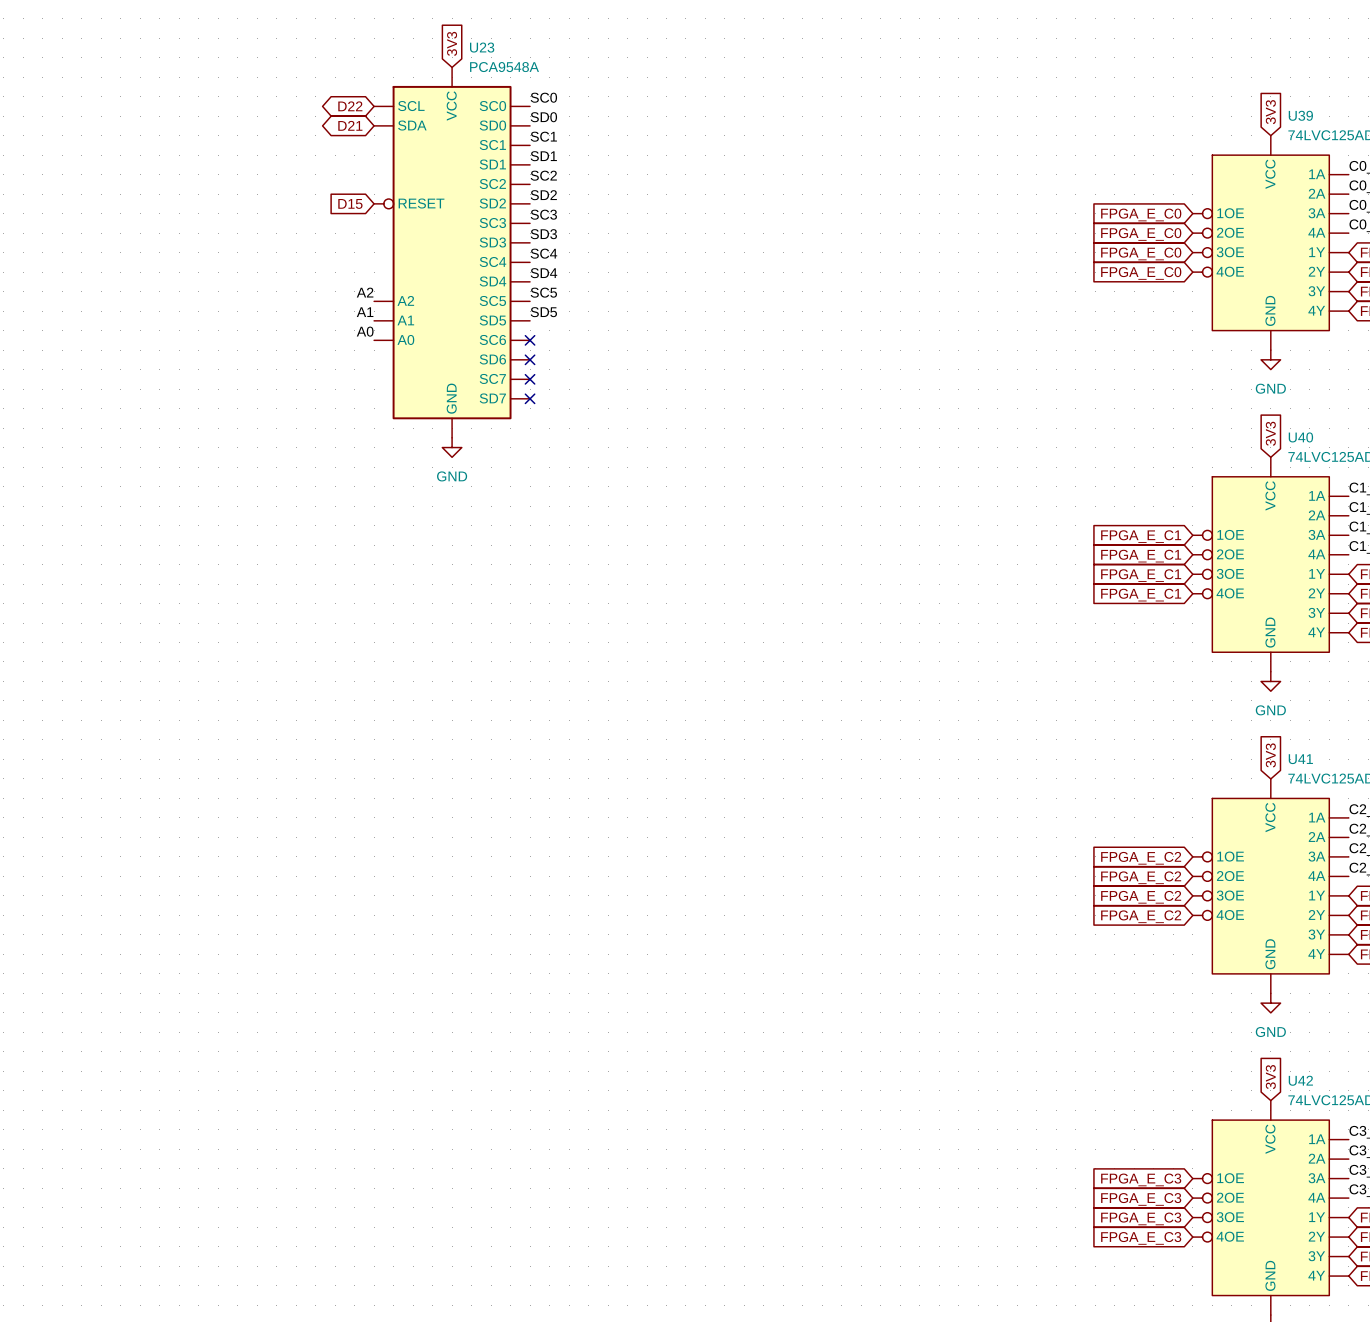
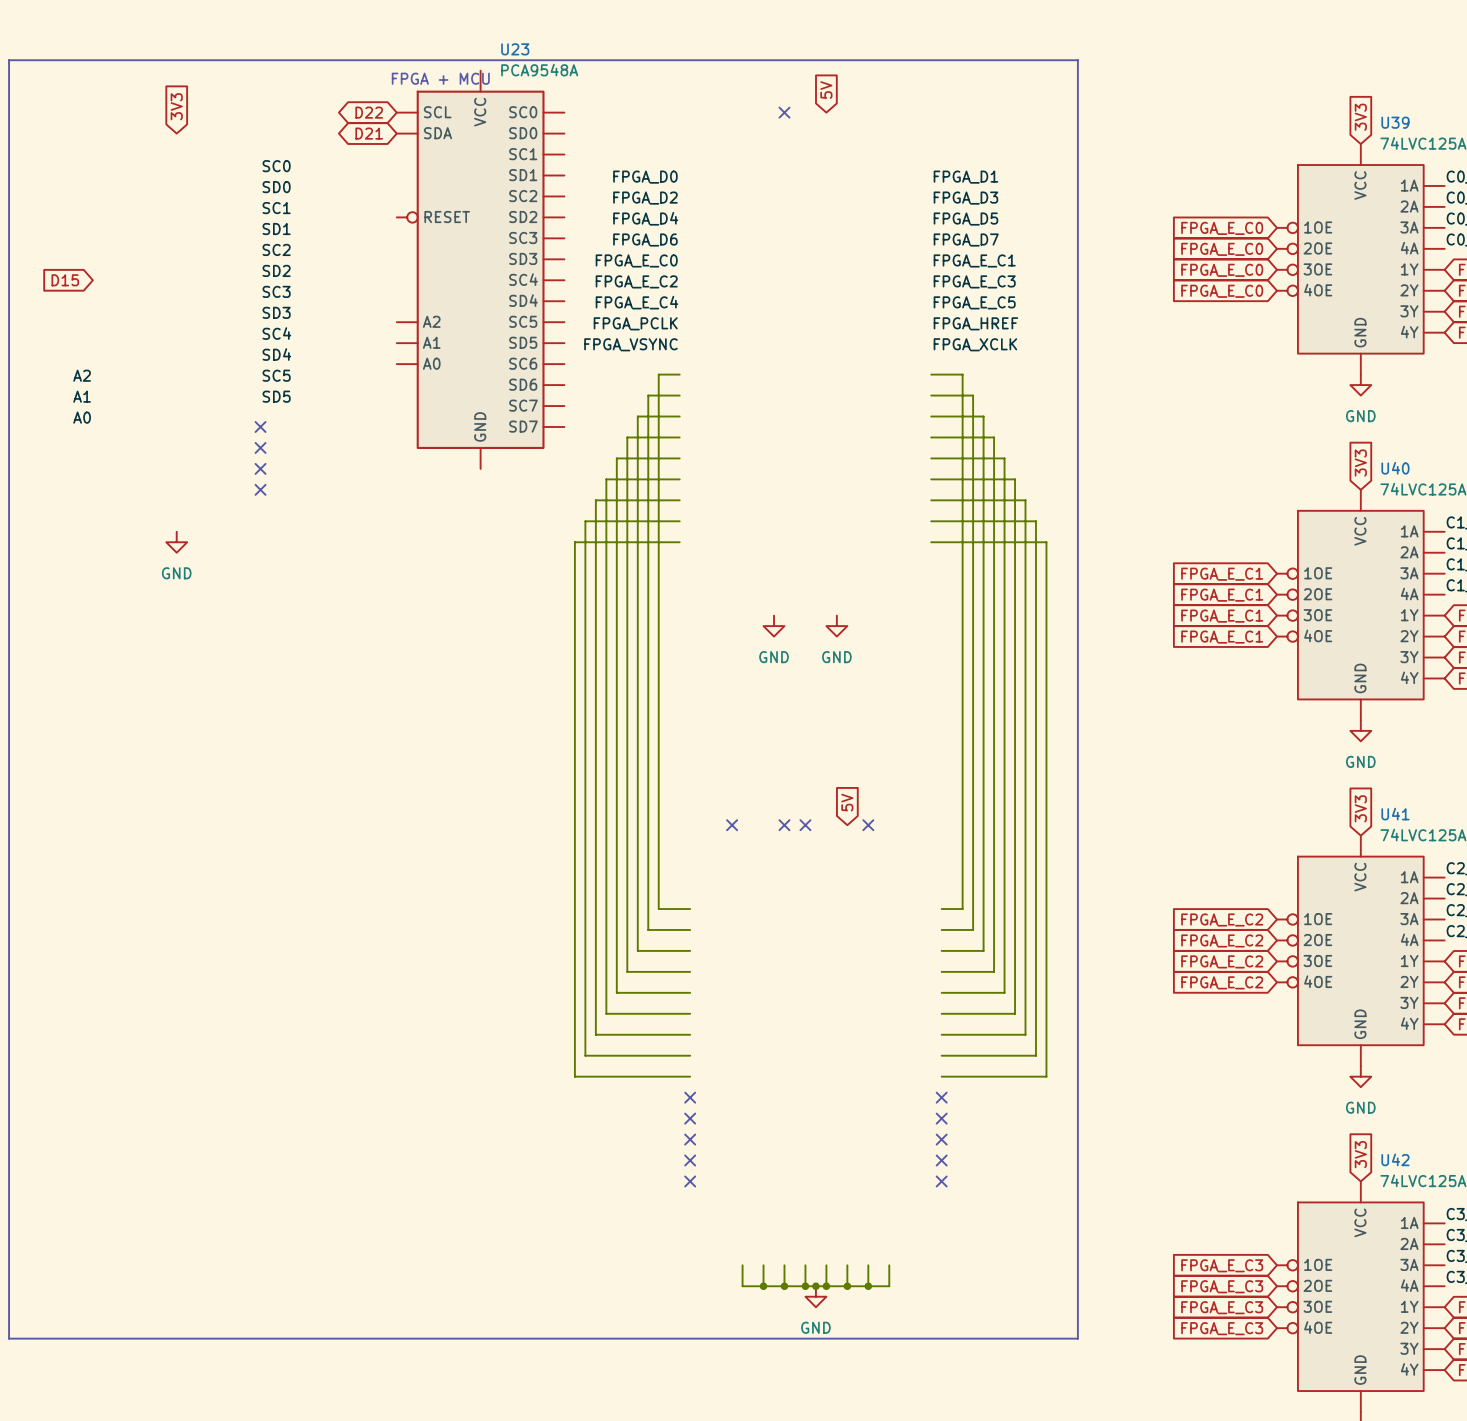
global label: 3V3 (452, 43) -> none
line: none -> (9, 60) (1077, 60) (1077, 1338) (9, 1338) (9, 60)
text: none -> FPGA + MCU (440, 78)
global label: none -> 5V (826, 90)
label: SC0 (543, 97) -> none
global label: none -> 3V3 (176, 106)
no-connect mark: none -> (784, 112)
label: SD0 (543, 117) -> none
label: SC1 (543, 136) -> none
label: none -> SC0 (276, 166)
label: SD1 (543, 156) -> none
label: none -> FPGA_D0 (645, 177)
label: none -> FPGA_D1 (965, 177)
label: none -> SD0 (276, 187)
label: SC2 (543, 175) -> none
label: none -> FPGA_D2 (645, 198)
label: none -> FPGA_D3 (965, 198)
label: none -> SC1 (276, 208)
label: SD2 (543, 195) -> none
global label: D15 (350, 203) -> none
label: none -> FPGA_D4 (645, 218)
label: none -> FPGA_D5 (965, 219)
label: none -> SD1 (276, 229)
label: SC3 (543, 214) -> none
label: none -> FPGA_D6 (645, 239)
label: none -> FPGA_D7 (966, 239)
label: none -> SC2 (276, 249)
label: SD3 (543, 234) -> none
label: none -> FPGA_E_C0 (636, 260)
label: none -> FPGA_E_C1 (974, 260)
label: none -> SD2 (276, 270)
label: SC4 (543, 253) -> none
global label: none -> D15 (65, 280)
label: none -> FPGA_E_C2 (636, 281)
label: none -> FPGA_E_C3 (974, 281)
label: none -> SC3 (276, 291)
label: SD4 (543, 273) -> none
label: none -> FPGA_E_C4 (636, 302)
label: none -> FPGA_E_C5 (974, 302)
label: none -> SD3 (276, 312)
label: A2 (365, 292) -> none
label: SC5 (543, 292) -> none
label: none -> FPGA_PCLK (635, 323)
label: none -> FPGA_HREF (975, 323)
label: none -> SC4 (276, 333)
label: A1 (365, 312) -> none
label: SD5 (543, 312) -> none
label: none -> FPGA_VSYNC (630, 344)
label: none -> FPGA_XCLK (975, 344)
label: none -> SD4 (276, 354)
label: A0 (365, 331) -> none
no-connect mark: (530, 340) -> none
wire: none -> (679, 374) (658, 374) (658, 909) (690, 909)
wire: none -> (931, 374) (962, 374) (962, 909) (941, 909)
label: none -> A2 (82, 375)
label: none -> SC5 (276, 375)
no-connect mark: (530, 359) -> none
wire: none -> (679, 395) (648, 395) (648, 929) (690, 929)
wire: none -> (931, 395) (973, 395) (973, 929) (941, 929)
label: none -> A1 (82, 396)
label: none -> SD5 (276, 396)
no-connect mark: (530, 379) -> none
wire: none -> (679, 416) (637, 416) (637, 950) (690, 950)
wire: none -> (931, 416) (983, 416) (983, 950) (941, 950)
label: none -> A0 (82, 417)
no-connect mark: none -> (260, 426)
no-connect mark: (530, 398) -> none
wire: none -> (679, 437) (627, 437) (627, 971) (690, 971)
wire: none -> (931, 437) (994, 437) (994, 971) (941, 971)
no-connect mark: none -> (260, 447)
wire: none -> (679, 458) (616, 458) (616, 992) (690, 992)
wire: none -> (931, 458) (1004, 458) (1004, 992) (941, 992)
no-connect mark: none -> (260, 468)
power symbol: GND (452, 447) -> none
wire: none -> (679, 479) (606, 479) (606, 1013) (690, 1013)
wire: none -> (931, 479) (1015, 479) (1015, 1013) (941, 1013)
no-connect mark: none -> (260, 489)
wire: none -> (679, 500) (595, 500) (595, 1034) (690, 1034)
wire: none -> (931, 500) (1025, 500) (1025, 1034) (941, 1034)
wire: none -> (679, 521) (585, 521) (585, 1055) (690, 1055)
wire: none -> (931, 521) (1035, 521) (1035, 1055) (941, 1055)
power symbol: none -> GND (176, 542)
wire: none -> (679, 542) (574, 542) (574, 1076) (690, 1076)
wire: none -> (931, 542) (1046, 542) (1046, 1076) (941, 1076)
power symbol: none -> GND (774, 626)
power symbol: none -> GND (836, 626)
global label: none -> 5V (847, 802)
no-connect mark: none -> (732, 825)
no-connect mark: none -> (784, 825)
no-connect mark: none -> (805, 825)
no-connect mark: none -> (868, 825)
no-connect mark: none -> (690, 1097)
no-connect mark: none -> (941, 1097)
no-connect mark: none -> (690, 1118)
no-connect mark: none -> (941, 1118)
no-connect mark: none -> (690, 1139)
no-connect mark: none -> (941, 1139)
no-connect mark: none -> (690, 1160)
no-connect mark: none -> (941, 1160)
no-connect mark: none -> (690, 1181)
no-connect mark: none -> (941, 1181)
wire: none -> (742, 1265) (742, 1286) (889, 1286) (889, 1265)
wire: none -> (763, 1265) (763, 1286)
wire: none -> (784, 1265) (784, 1286)
wire: none -> (805, 1265) (805, 1286)
wire: none -> (826, 1265) (826, 1286)
wire: none -> (847, 1265) (847, 1286)
wire: none -> (868, 1265) (868, 1286)
junction: none -> (763, 1286)
junction: none -> (784, 1286)
junction: none -> (805, 1286)
junction: none -> (815, 1286)
junction: none -> (826, 1286)
junction: none -> (847, 1286)
junction: none -> (868, 1286)
power symbol: none -> GND (815, 1296)

